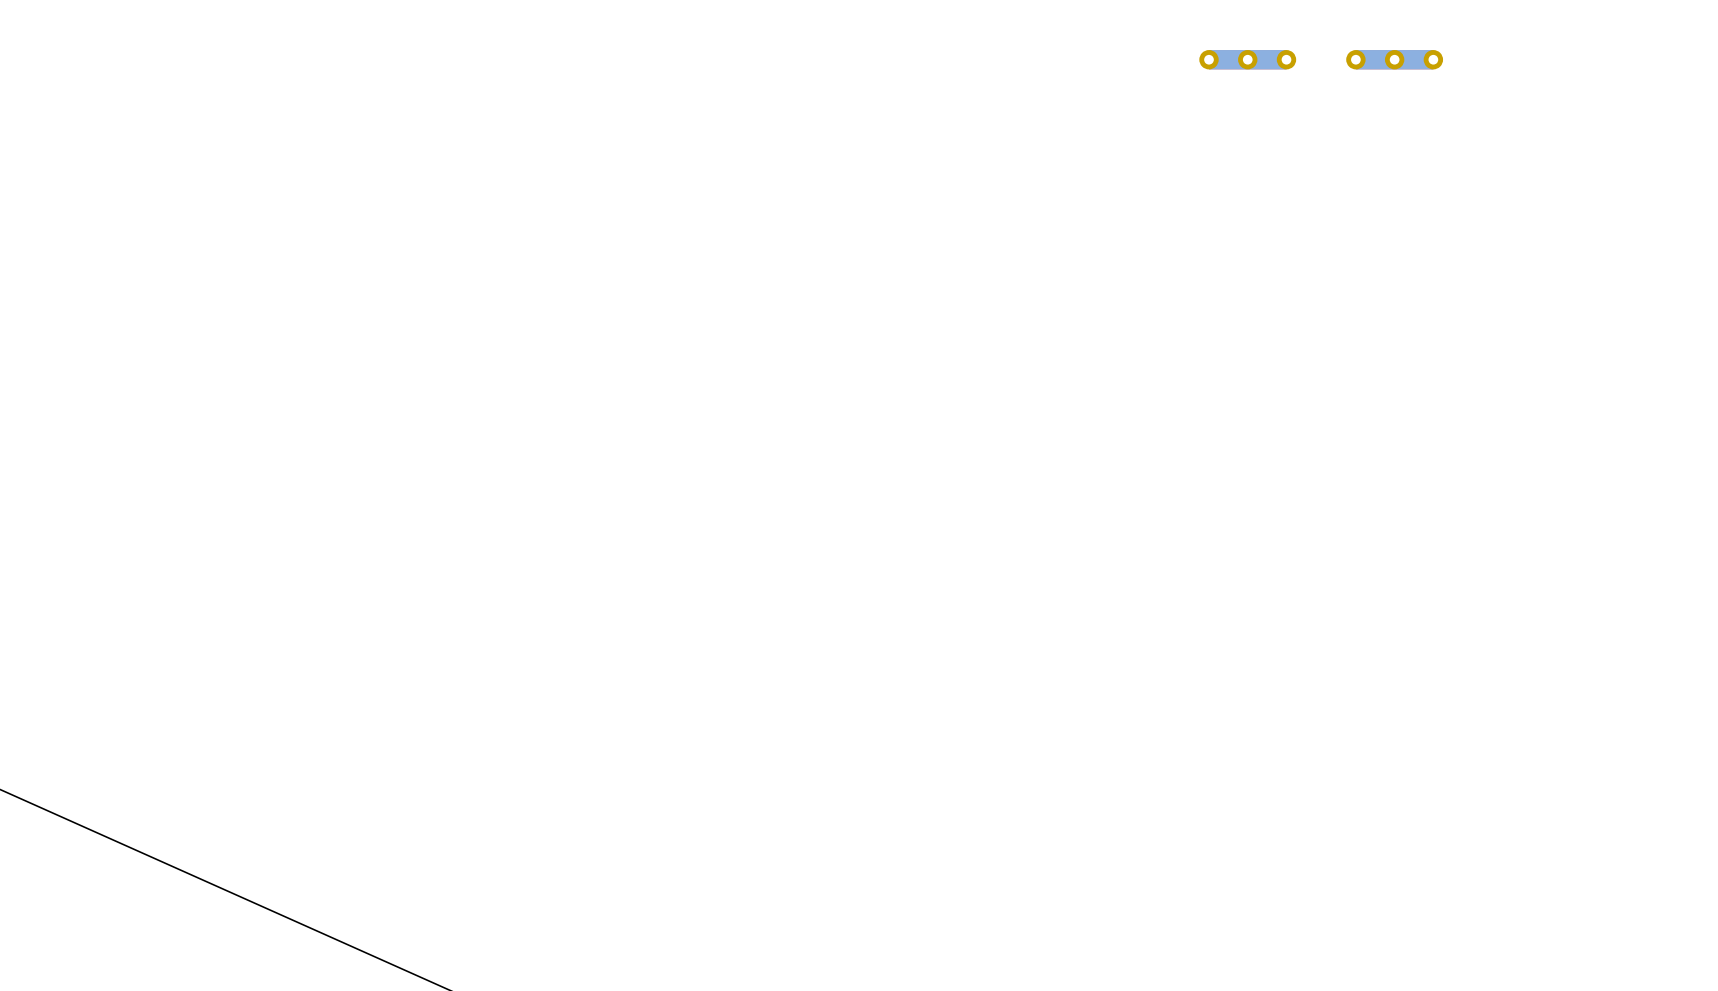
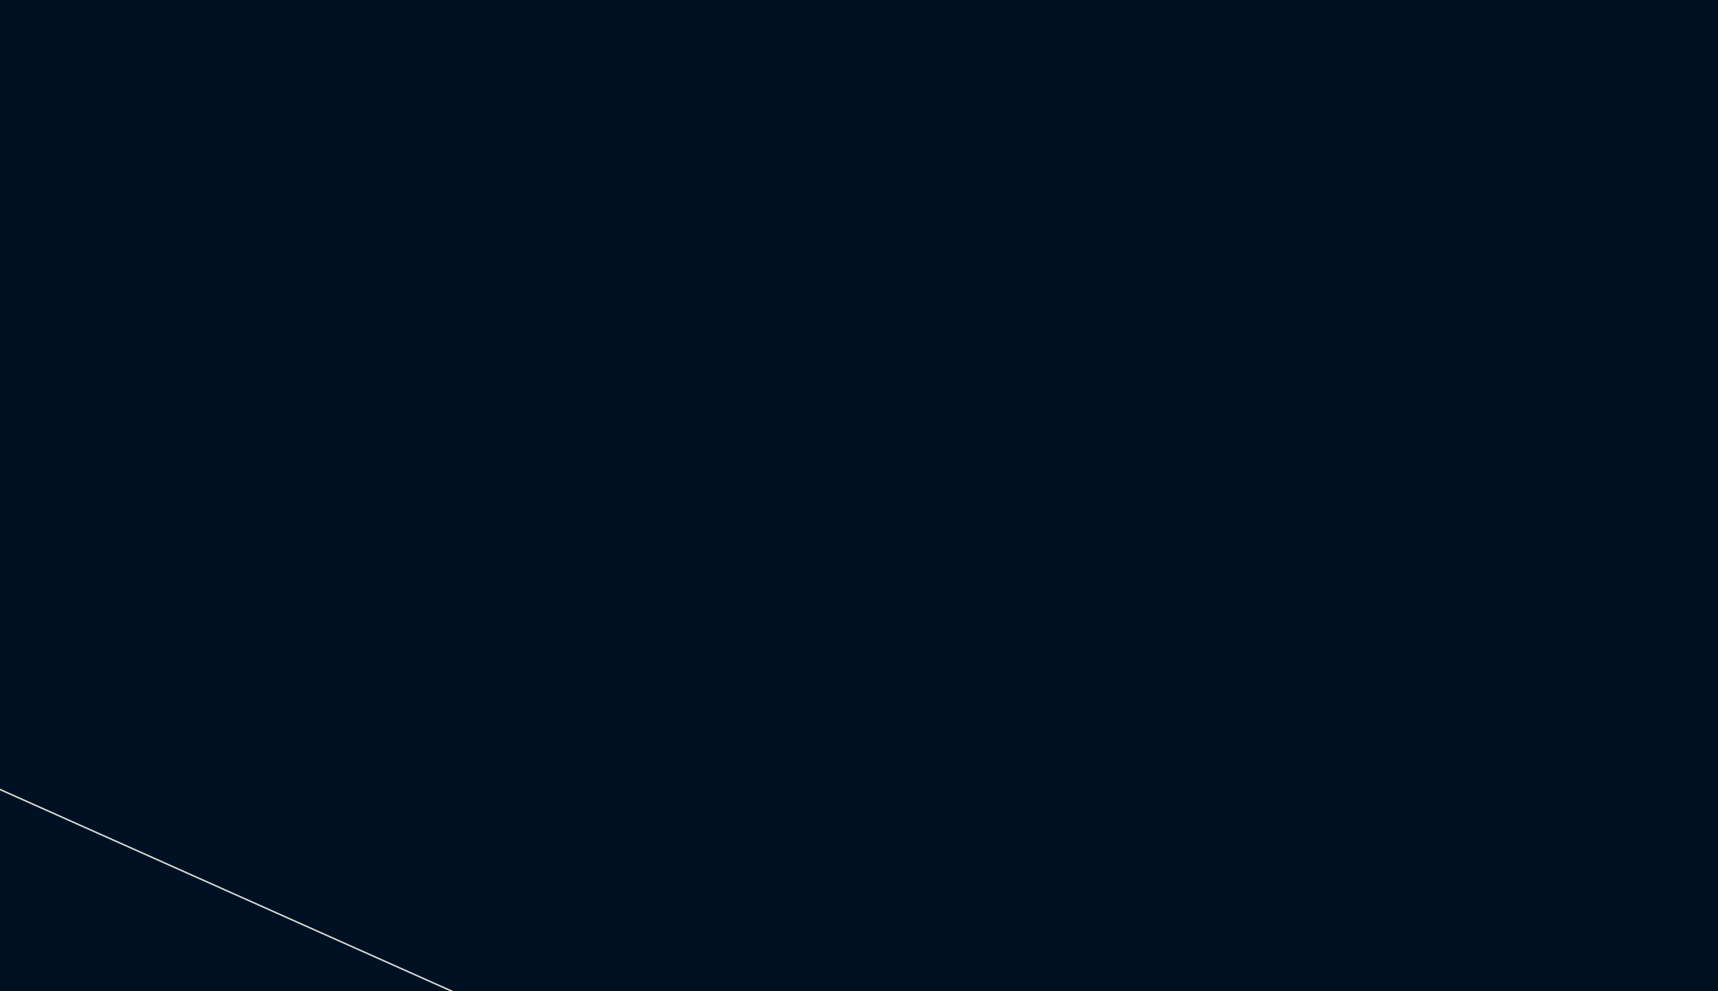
part: (1247, 59) -> none
part: (1394, 59) -> none

